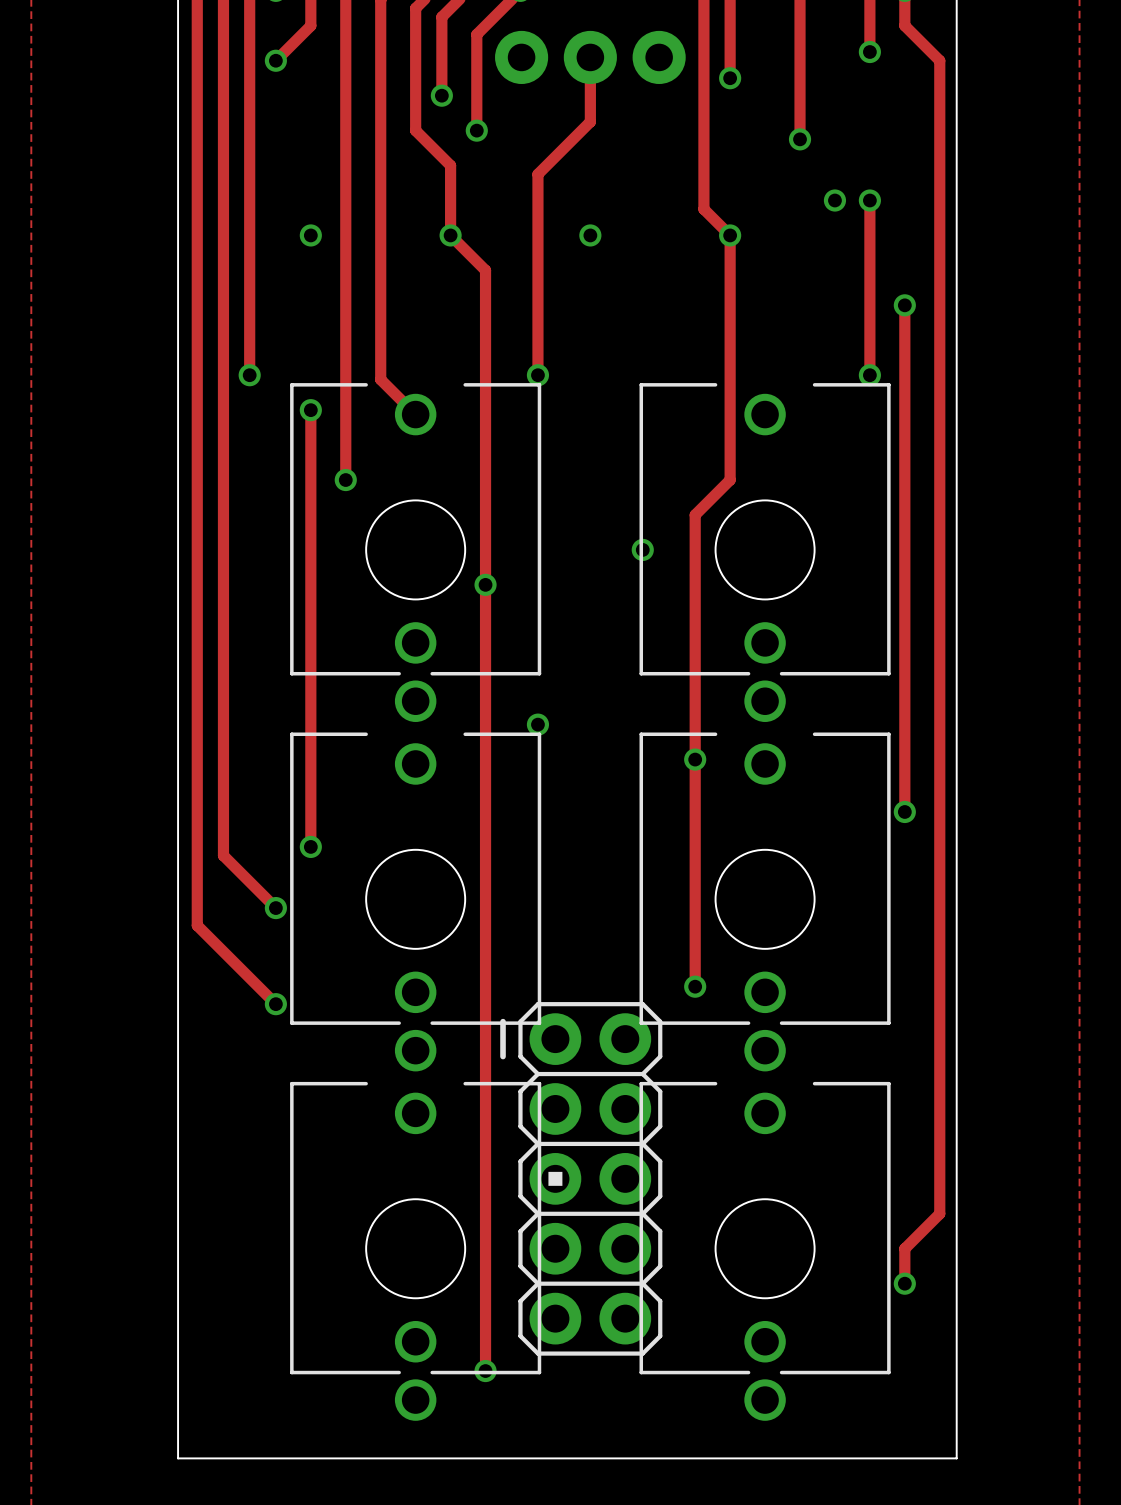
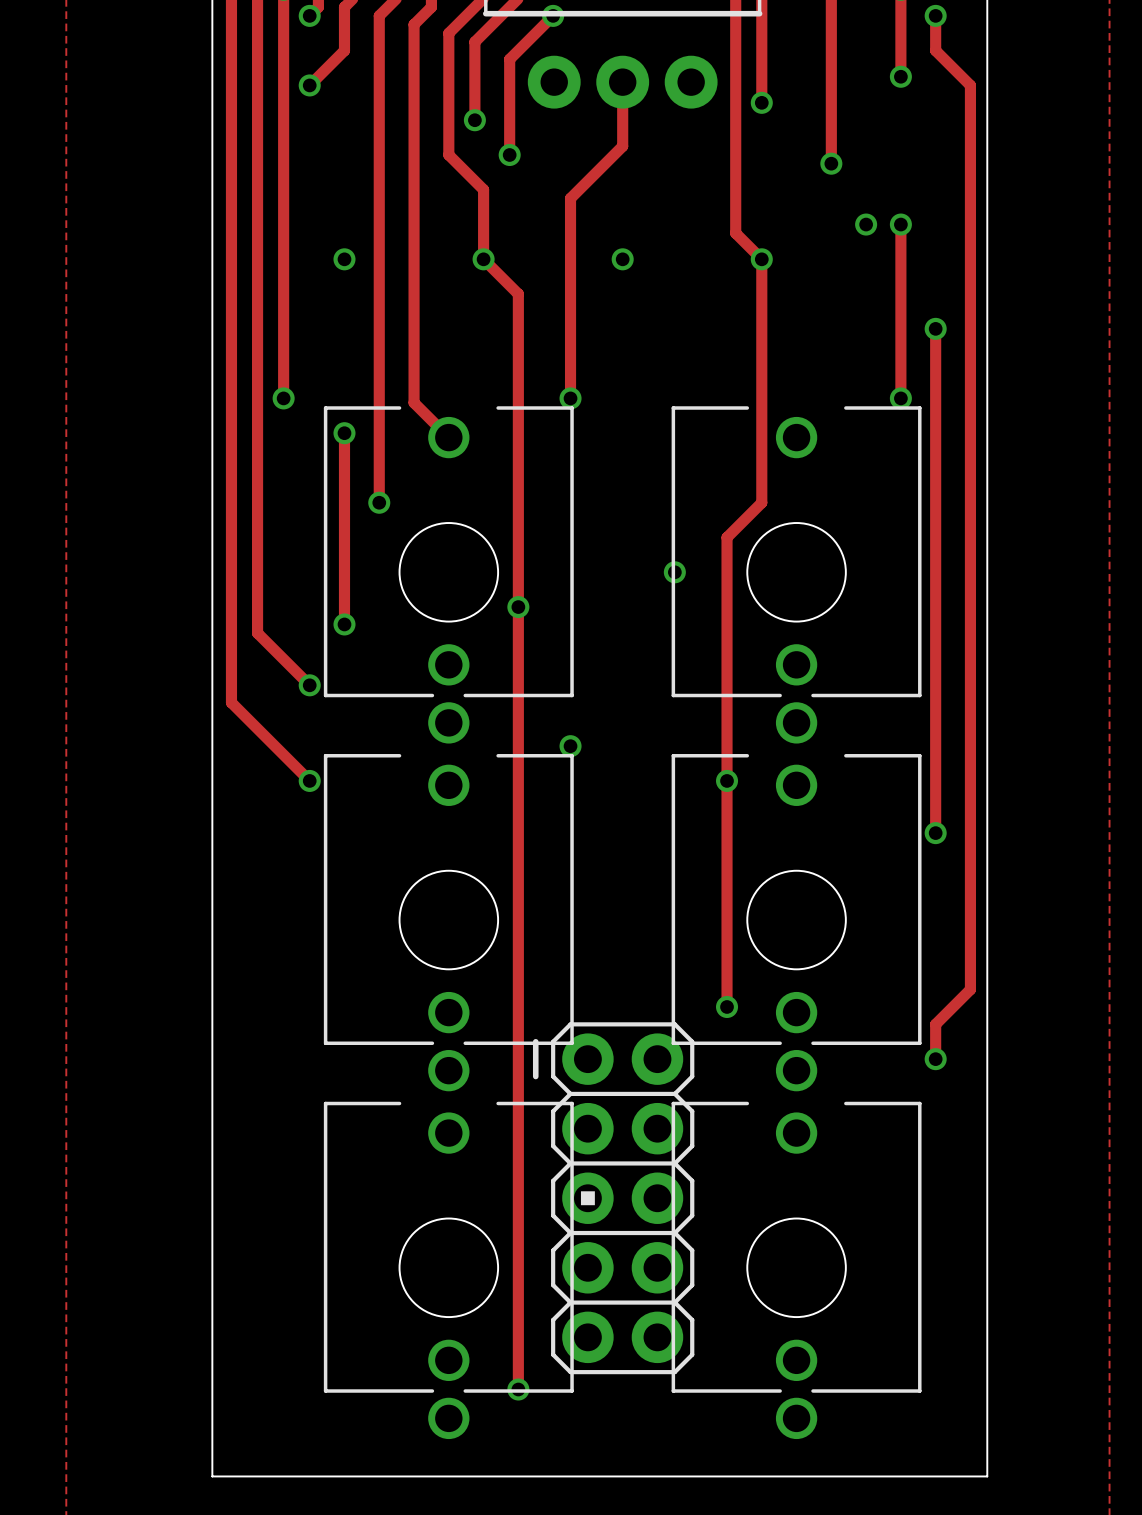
track: (310, 602) (310, 846) -> none
via: none -> (344, 624)
track: (223, 611) (223, 855) (275, 908) -> (257, 633) (309, 685)
via: none -> (309, 685)
track: (197, 680) (197, 925) (275, 1004) -> (231, 702) (309, 780)
via: none -> (309, 780)
via: (310, 846) -> none
via: (275, 908) -> none
track: (939, 969) (939, 1213) (904, 1248) (904, 1283) -> (970, 989) (935, 1024) (935, 1059)
via: (275, 1004) -> none
via: none -> (935, 1059)
via: (904, 1283) -> none

